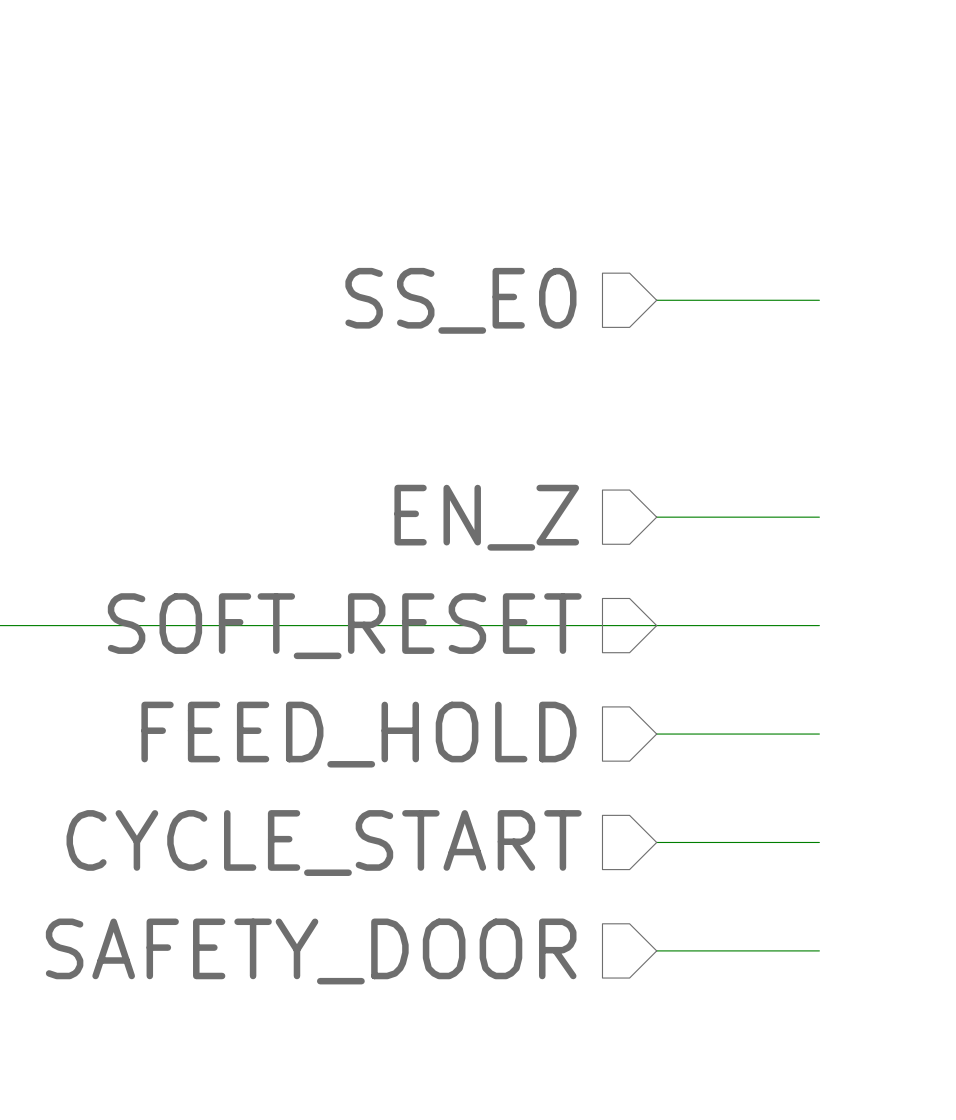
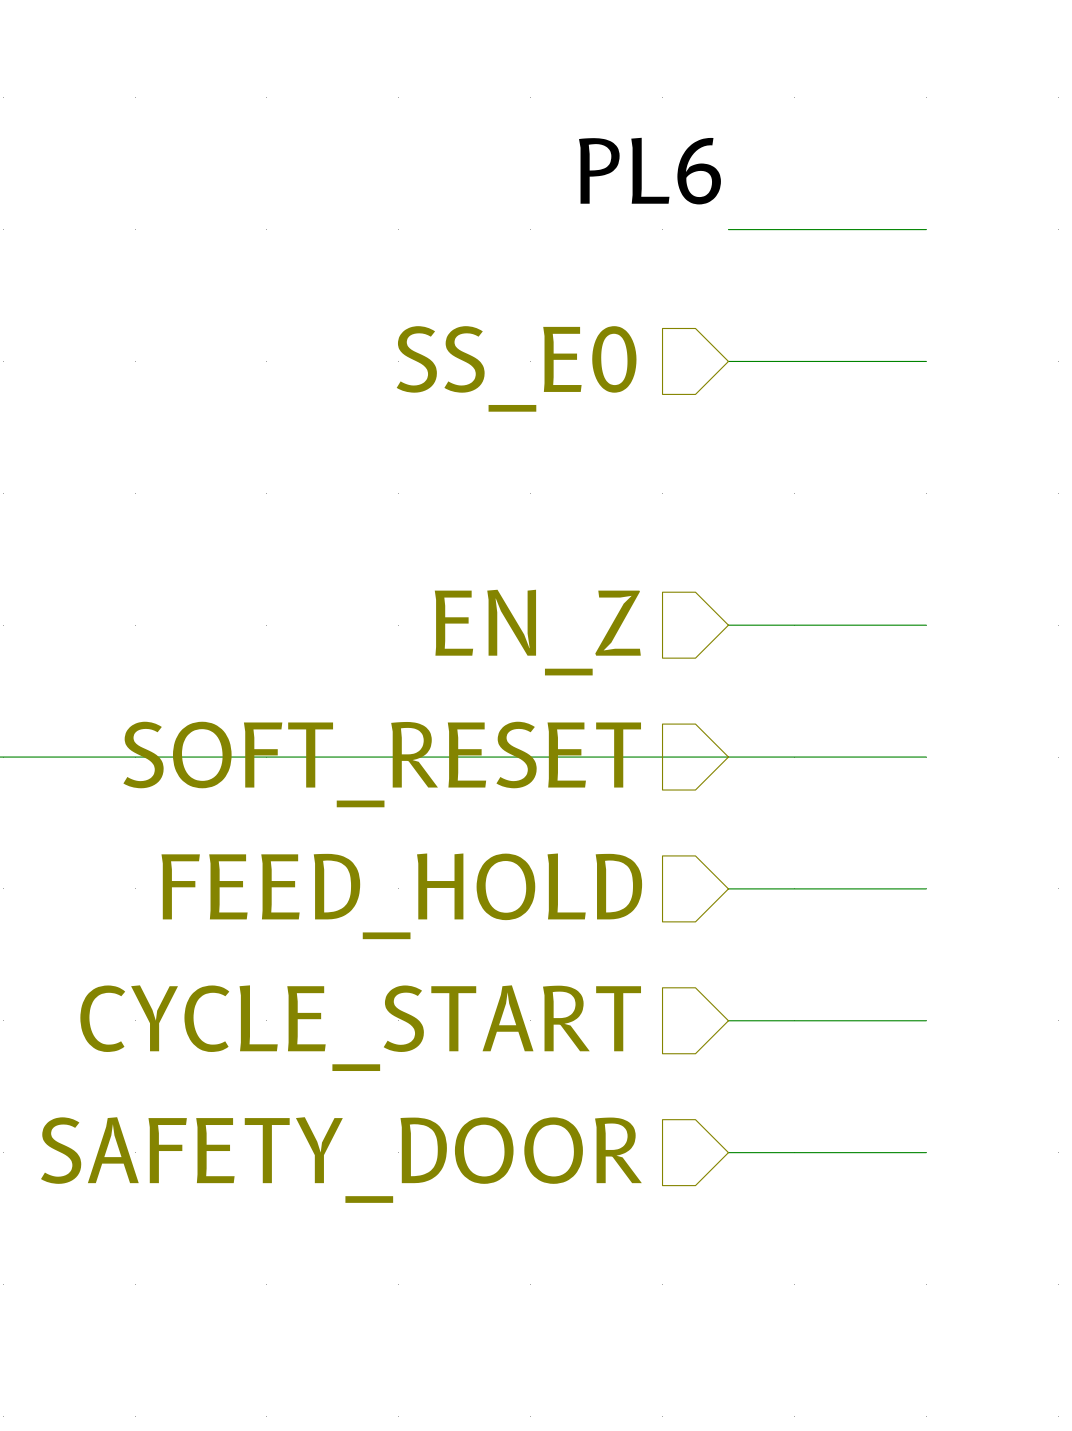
label: none -> PL6 (649, 171)
wire: none -> (728, 229) (926, 229)

